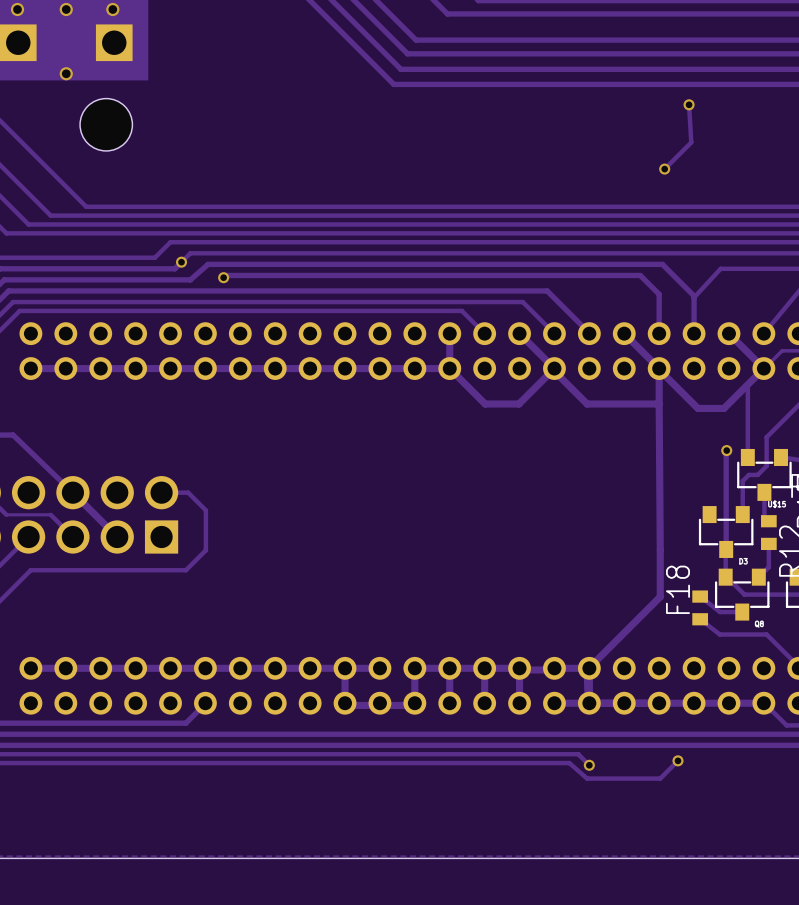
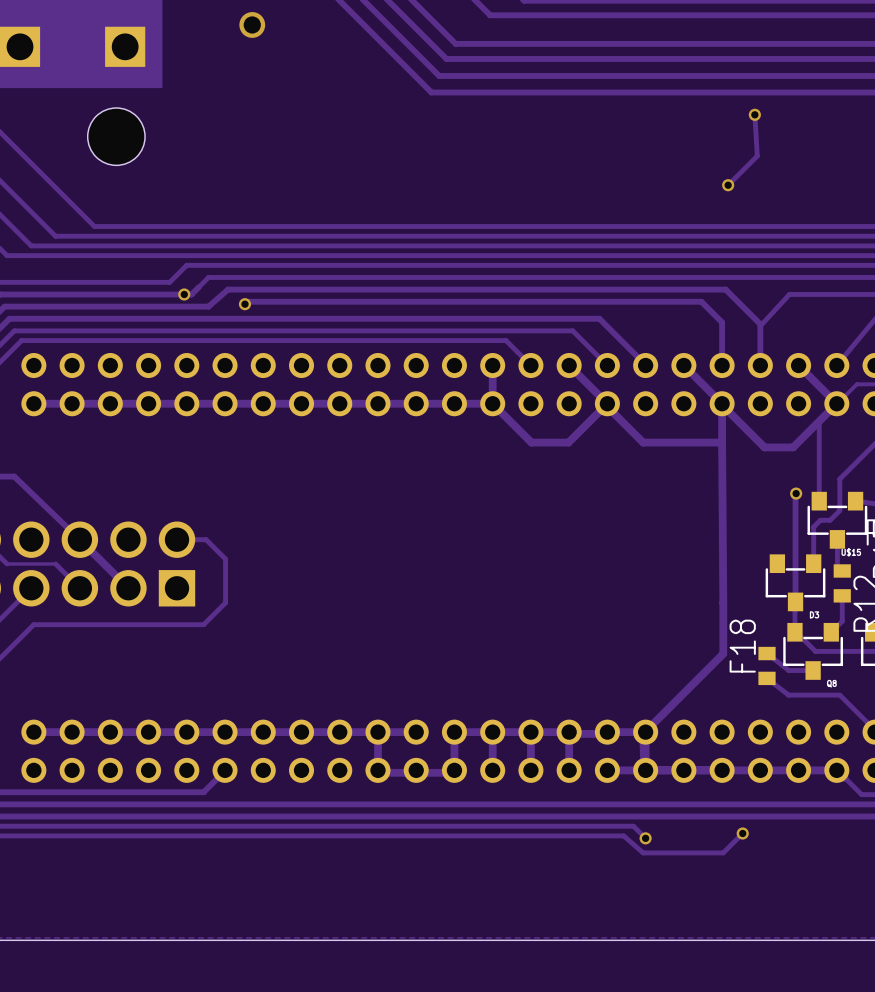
via: (17, 9) -> none
via: (66, 9) -> none
via: (112, 9) -> none
via: none -> (252, 24)
via: (66, 73) -> none
via position: (181, 262) -> (184, 294)

